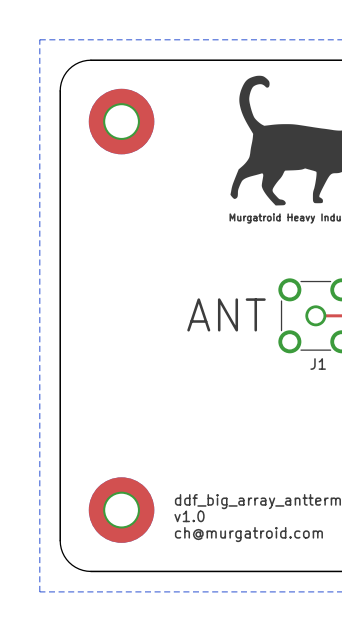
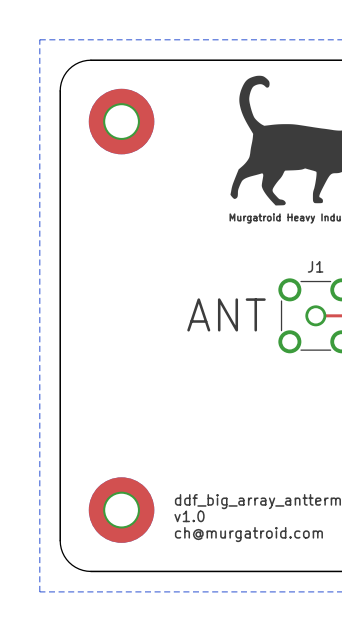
J1 name position: J1 (318, 364) -> J1 (315, 266)

